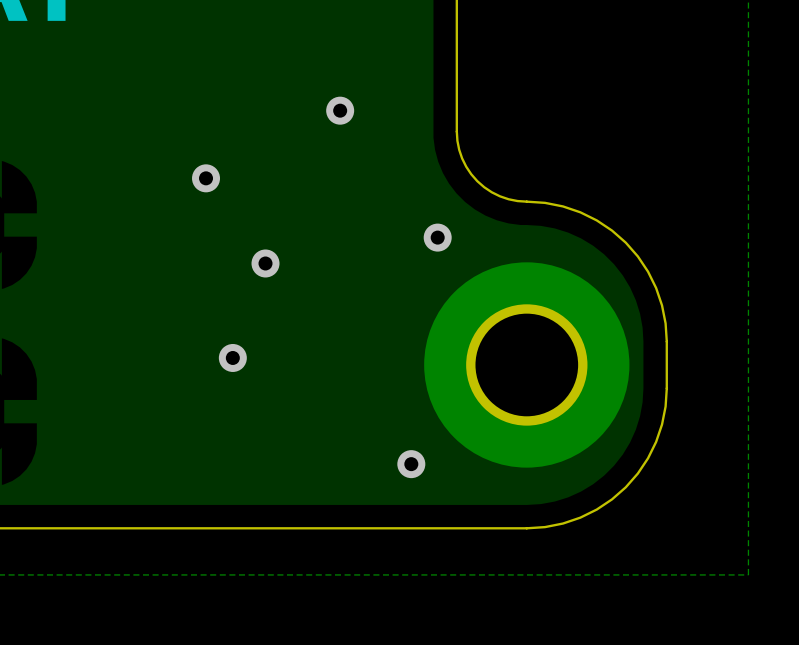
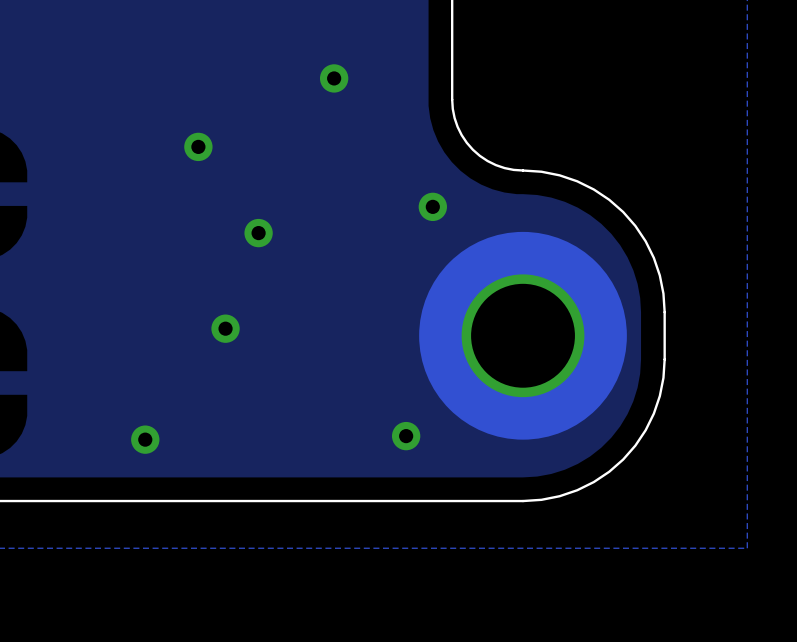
via: none -> (145, 439)

